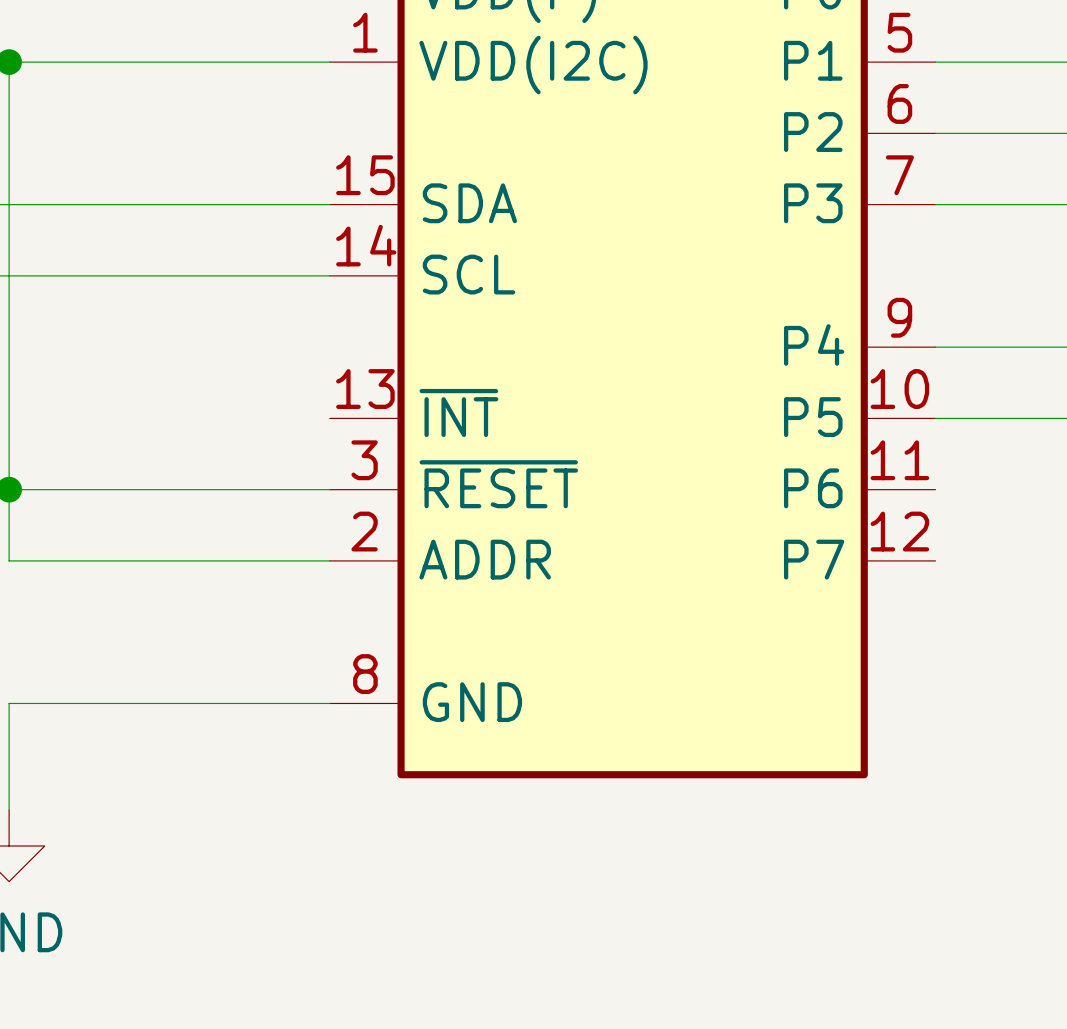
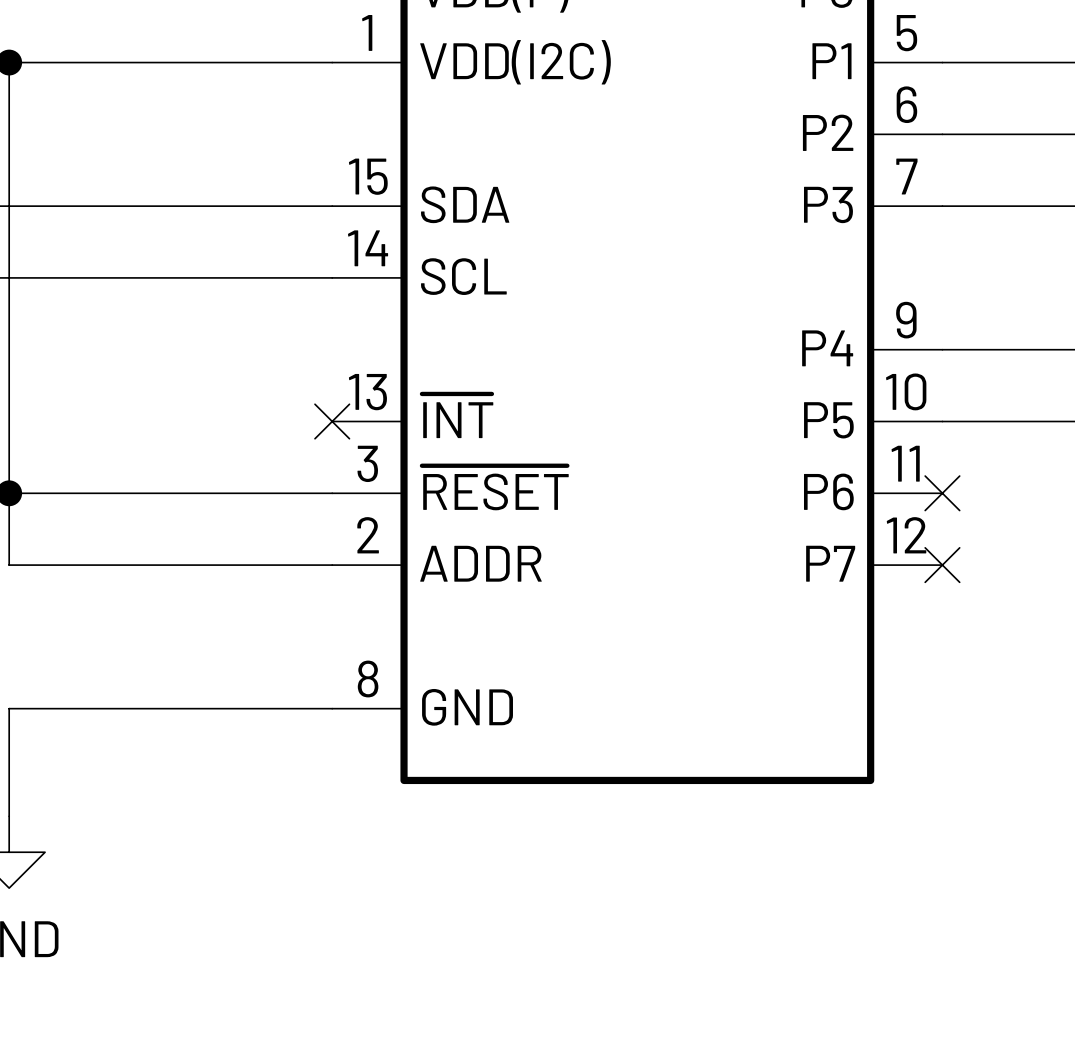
no-connect mark: none -> (332, 421)
no-connect mark: none -> (942, 493)
no-connect mark: none -> (942, 565)

